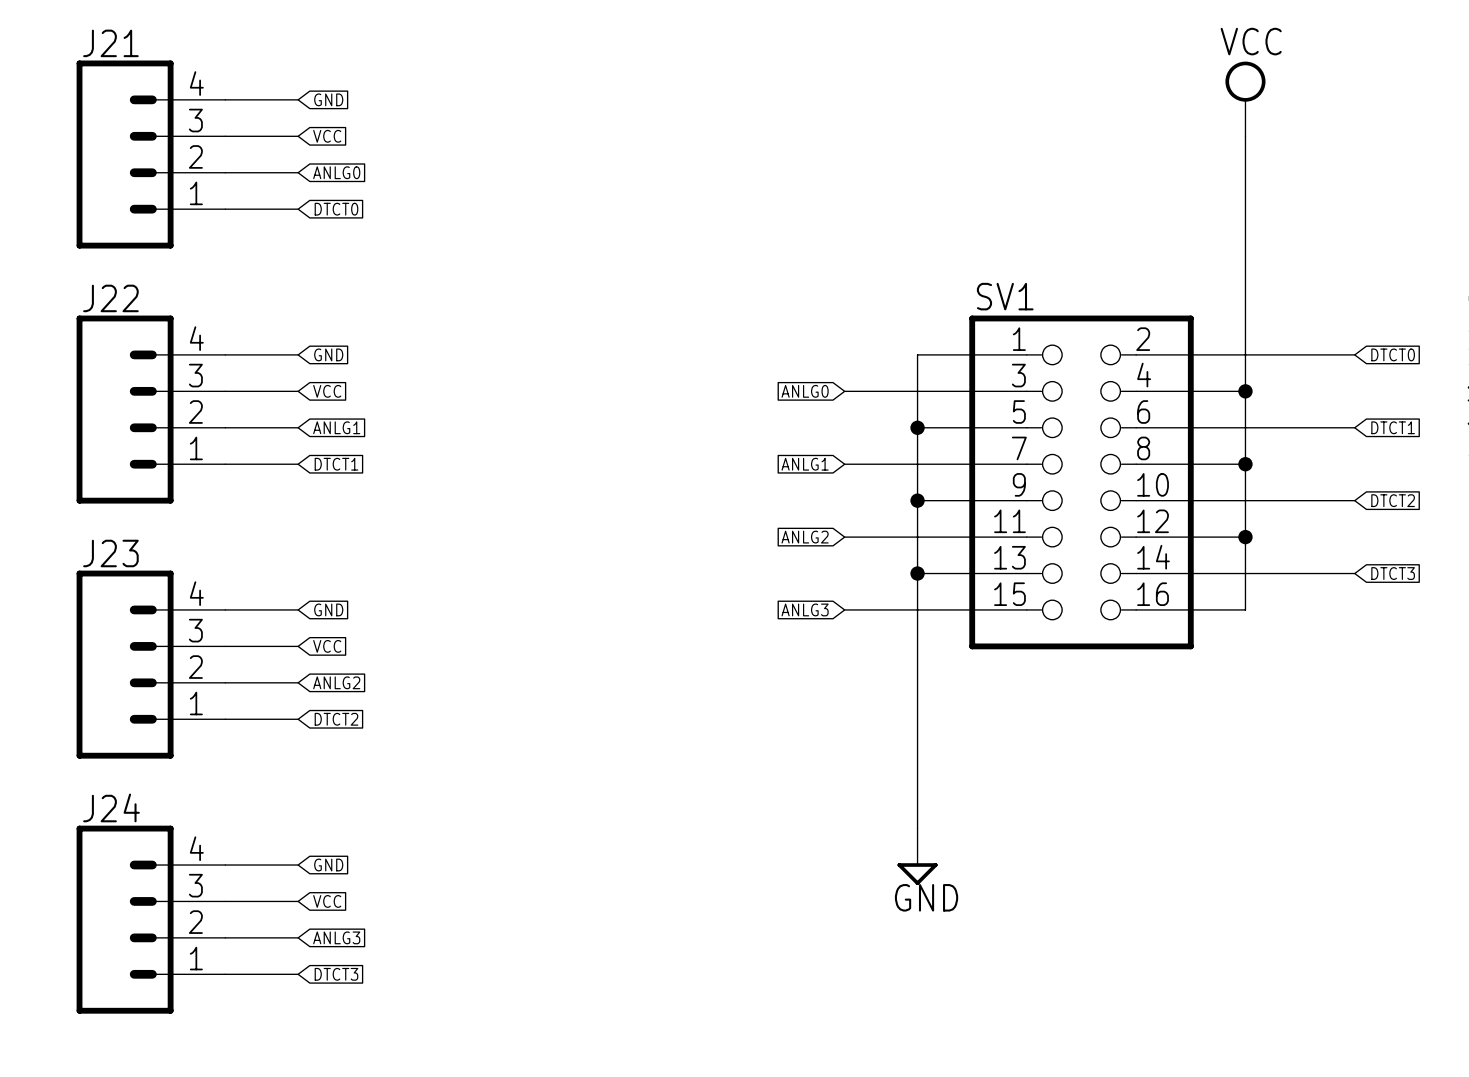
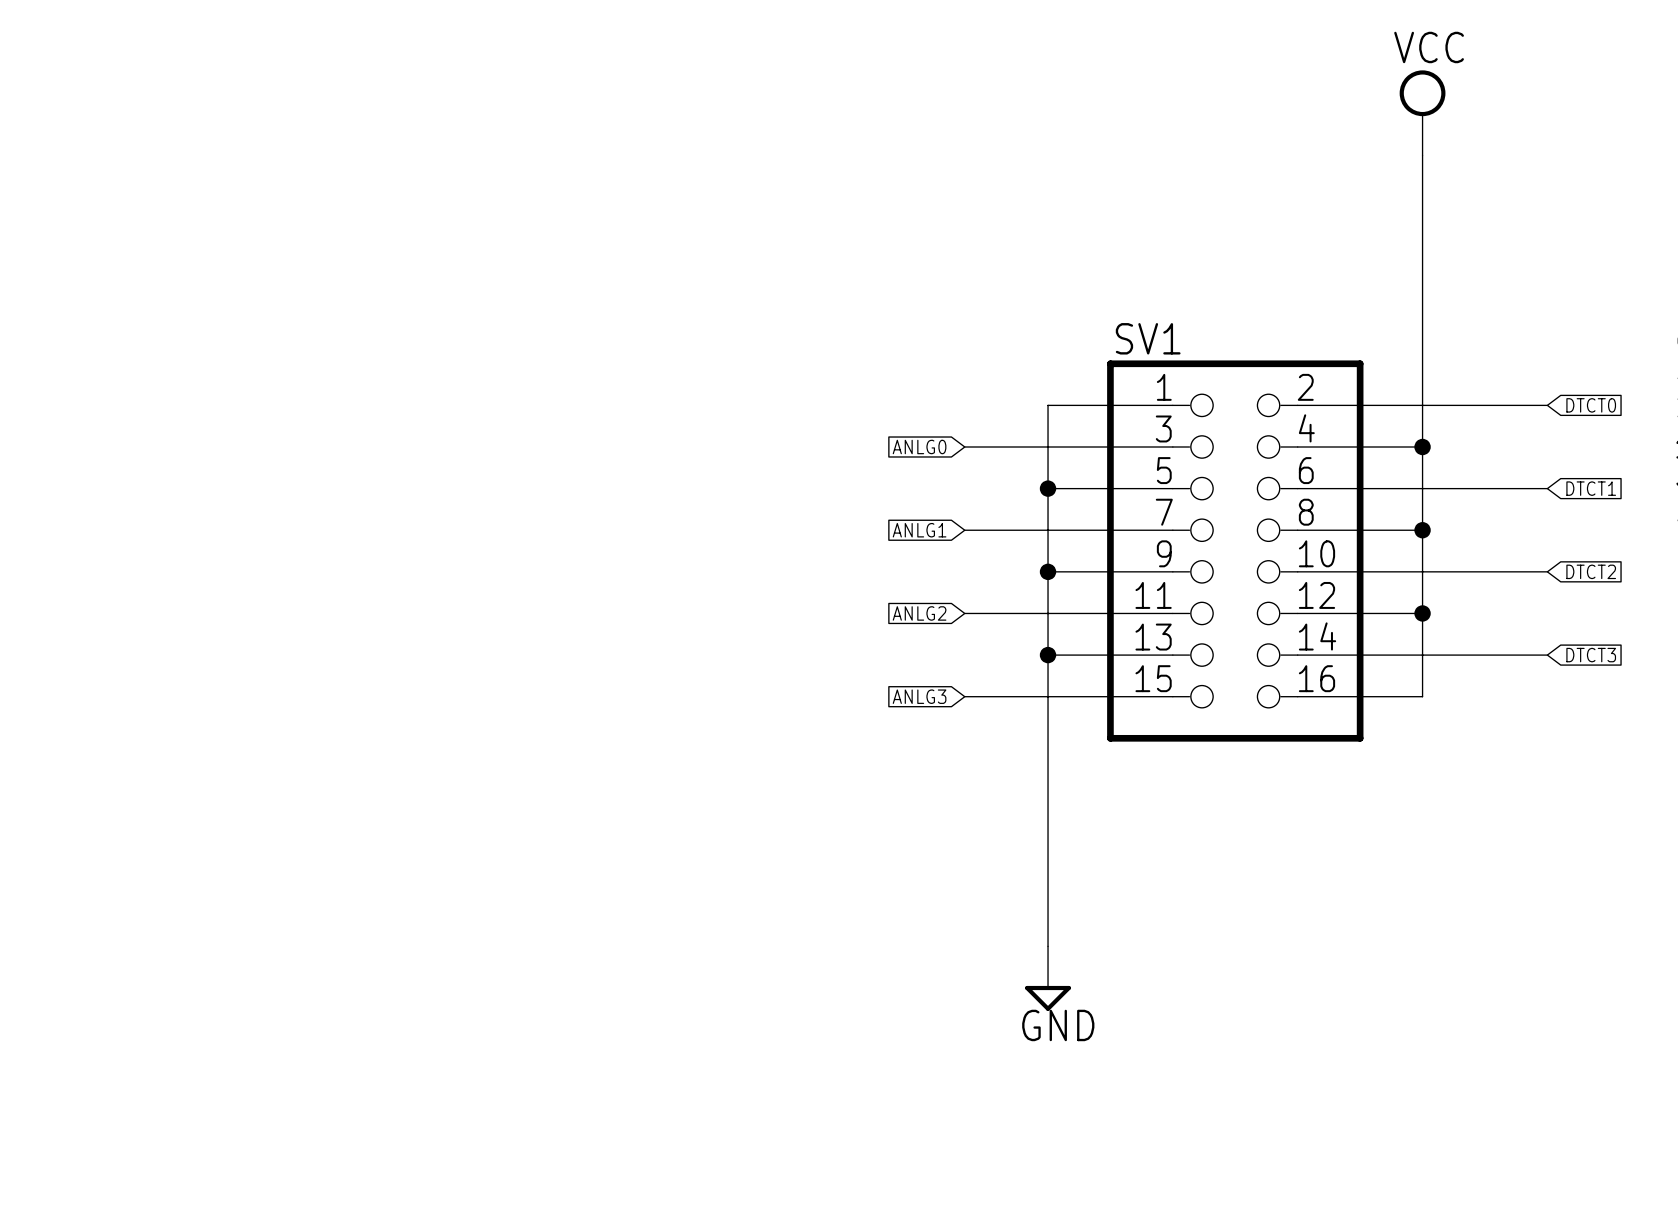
wire: (225, 99) (298, 99) -> none
global label: GND (328, 99) -> none
wire: (225, 136) (298, 136) -> none
global label: VCC (327, 136) -> none
J21: (150, 154) -> none
wire: (225, 172) (298, 172) -> none
global label: ANLG0 (336, 172) -> none
wire: (225, 209) (298, 209) -> none
global label: DTCT0 (336, 209) -> none
wire: (225, 354) (298, 354) -> none
global label: GND (328, 354) -> none
wire: (225, 391) (298, 391) -> none
global label: VCC (327, 391) -> none
J22: (150, 409) -> none
wire: (225, 427) (298, 427) -> none
global label: ANLG1 (336, 427) -> none
wire: (225, 464) (298, 464) -> none
global label: DTCT1 (336, 464) -> none
wire: (225, 609) (298, 609) -> none
global label: GND (328, 609) -> none
wire: (225, 646) (298, 646) -> none
global label: VCC (327, 646) -> none
J23: (150, 664) -> none
wire: (225, 682) (298, 682) -> none
global label: ANLG2 (336, 682) -> none
wire: (225, 719) (298, 719) -> none
global label: DTCT2 (336, 719) -> none
wire: (225, 865) (298, 865) -> none
global label: GND (328, 865) -> none
wire: (225, 901) (298, 901) -> none
global label: VCC (327, 901) -> none
J24: (150, 919) -> none
wire: (225, 937) (298, 937) -> none
global label: ANLG3 (336, 937) -> none
wire: (225, 974) (298, 974) -> none
global label: DTCT3 (336, 974) -> none

